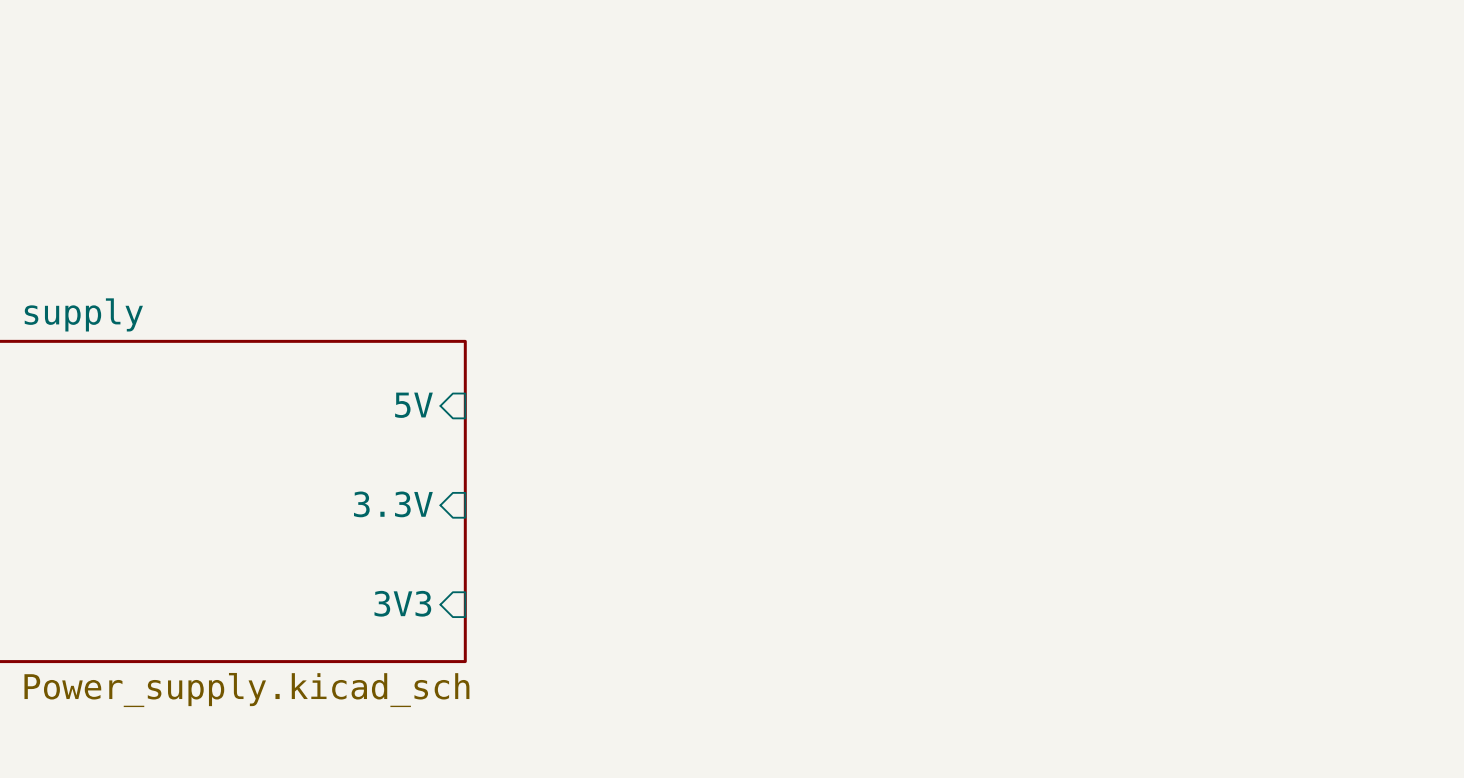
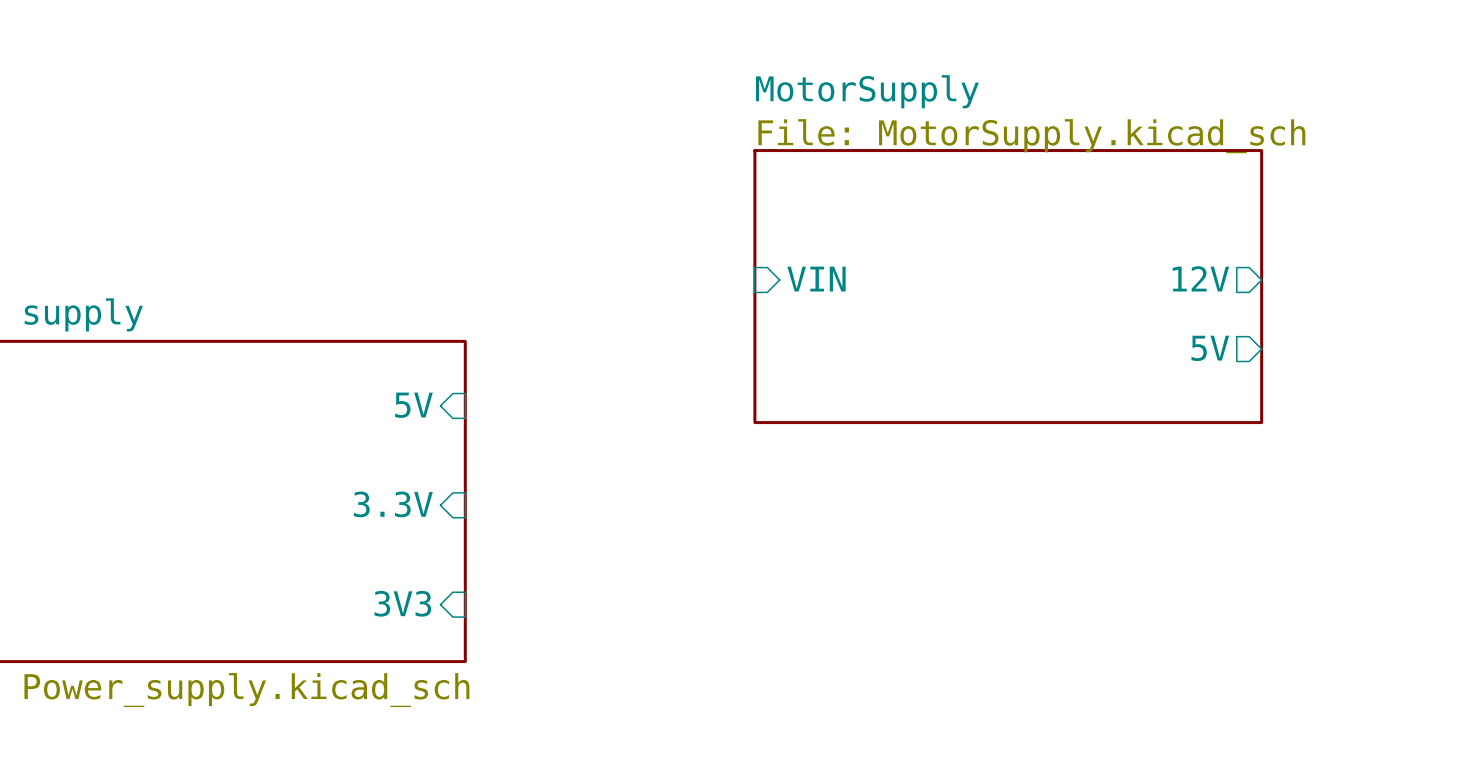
sheet pin: none -> 12V (1200, 278)
sheet pin: none -> VIN (816, 279)
sheet MotorSupply: none -> File: MotorSupply.kicad_sch (1008, 286)
sheet pin: none -> 5V (1210, 348)

